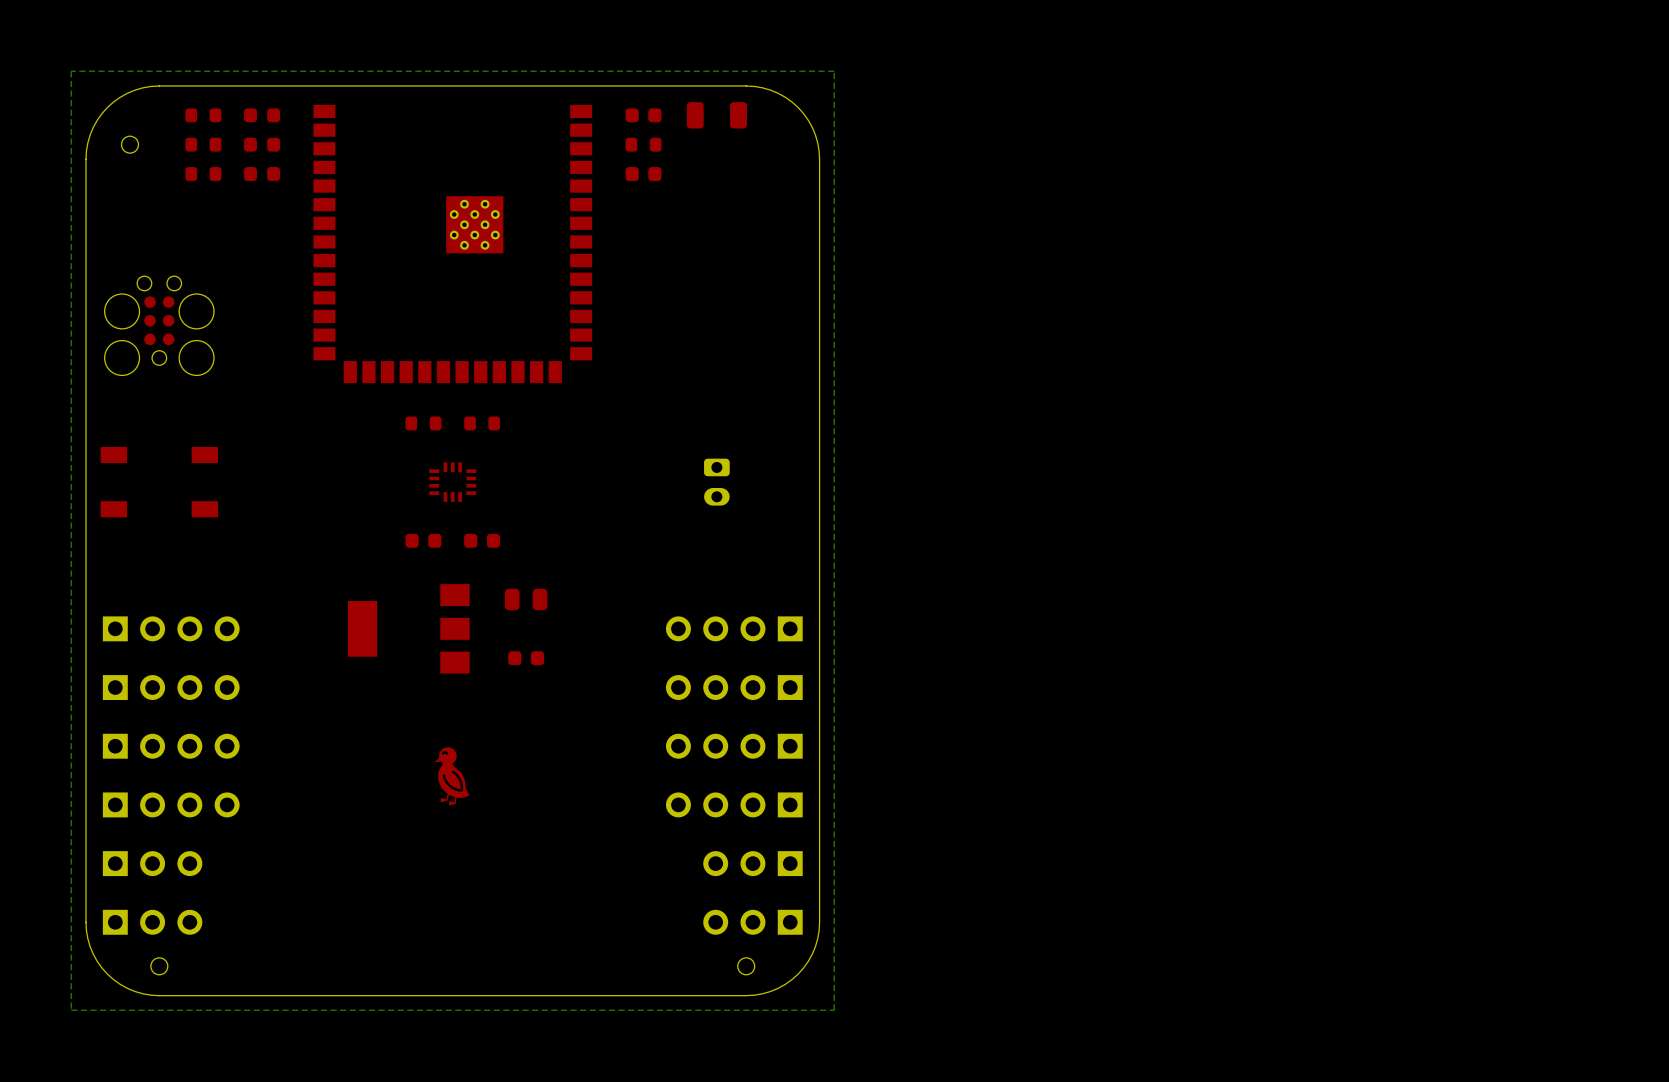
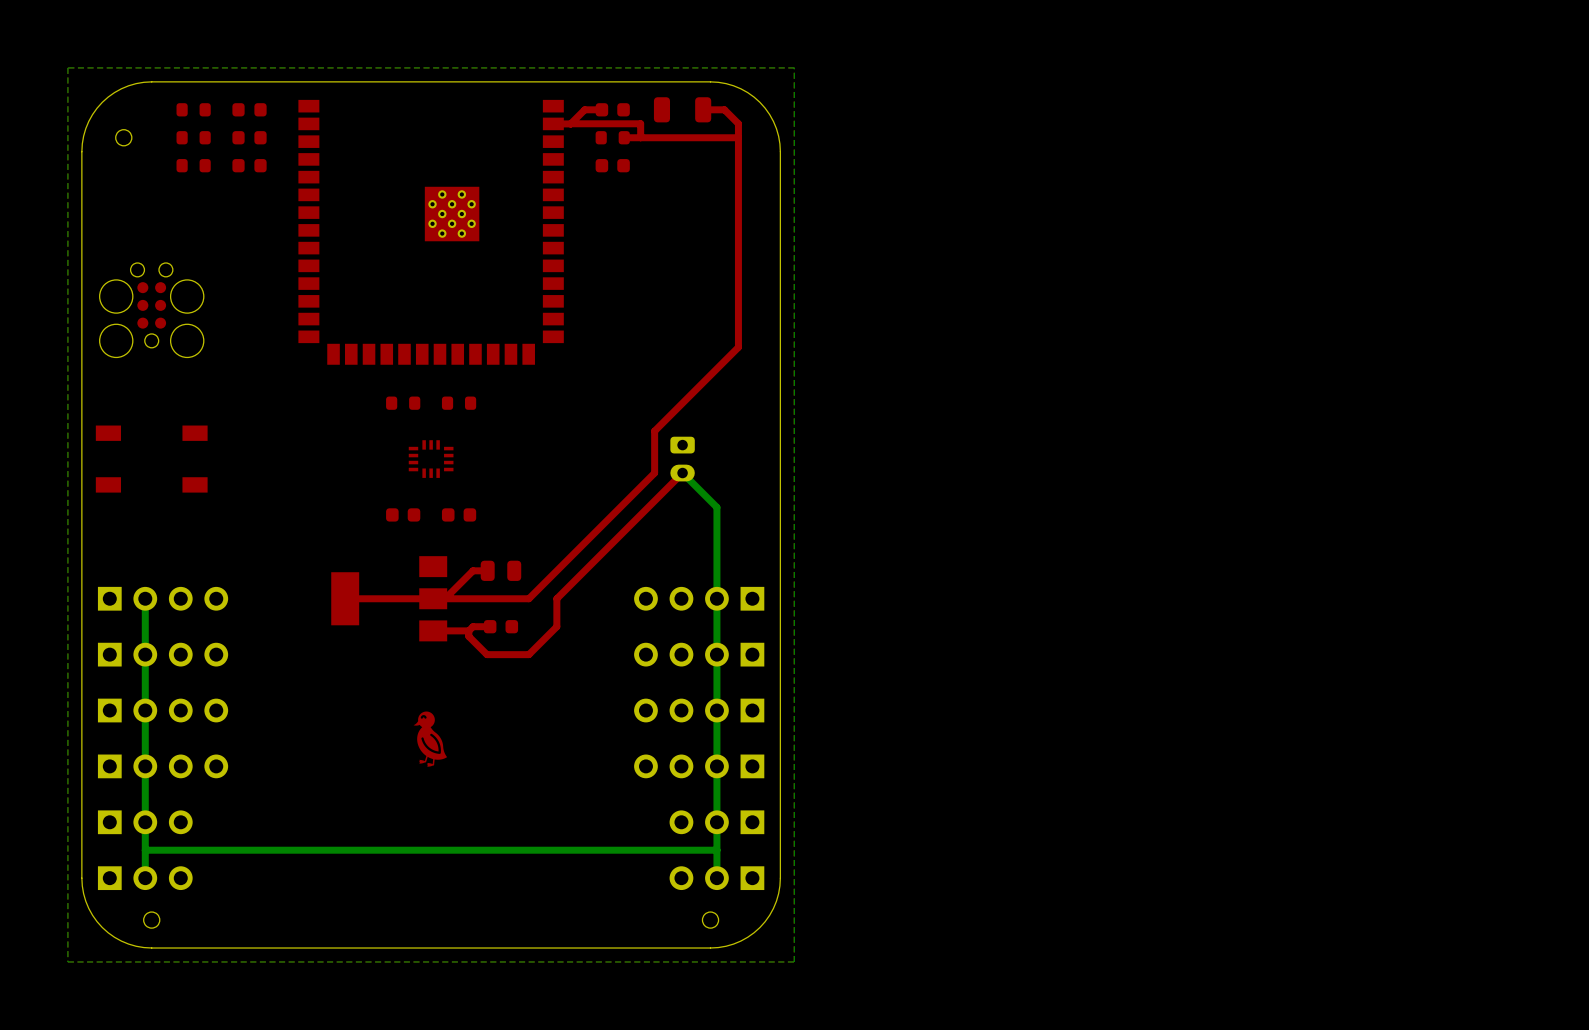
top track: none -> (601, 109) (584, 109) (570, 123) (553, 123)
top track: none -> (703, 109) (724, 109) (738, 123) (738, 347) (654, 431) (654, 473) (528, 598) (345, 598)
top track: none -> (570, 123) (640, 123) (640, 137)
top track: none -> (738, 137) (624, 137)
top track: none -> (682, 473) (556, 598) (556, 626) (528, 654) (487, 654) (468, 636) (468, 630)
bottom track: none -> (682, 473) (716, 507) (716, 878)
top track: none -> (487, 570) (473, 570) (445, 598)
bottom track: none -> (145, 598) (145, 878)
top track: none -> (490, 626) (473, 626) (468, 630)
top track: none -> (468, 630) (433, 630)
bottom track: none -> (716, 850) (145, 850)

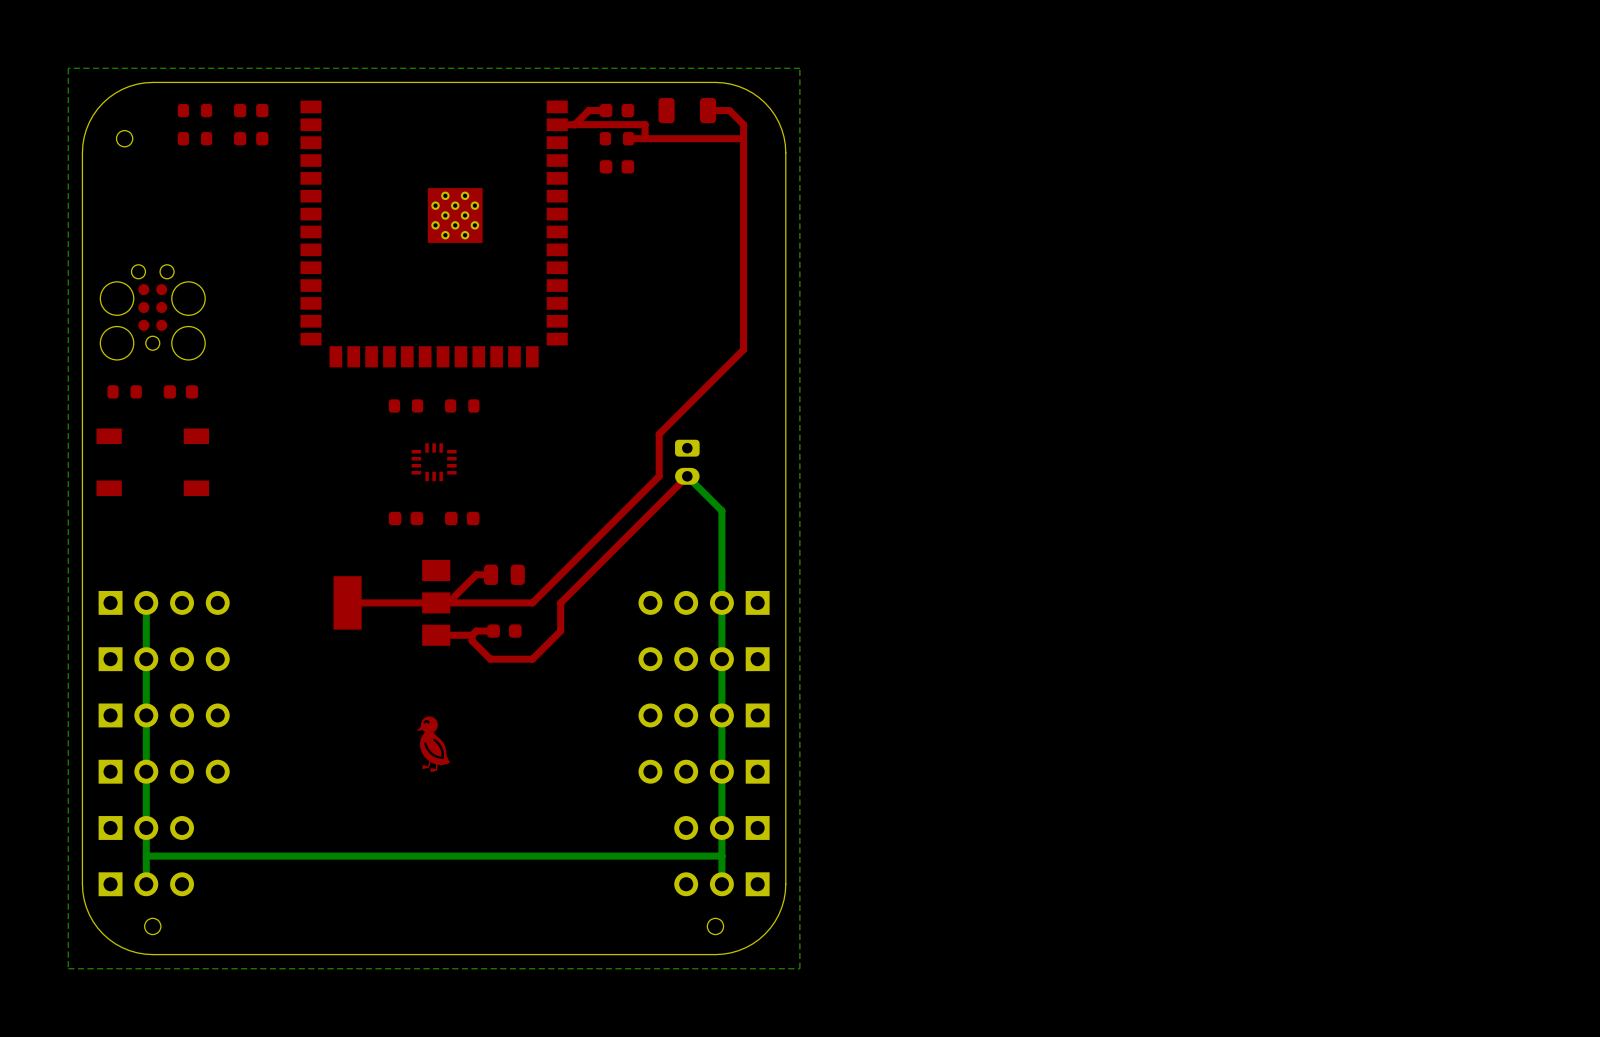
part position: (193, 165) -> (124, 391)
part position: (249, 165) -> (180, 391)

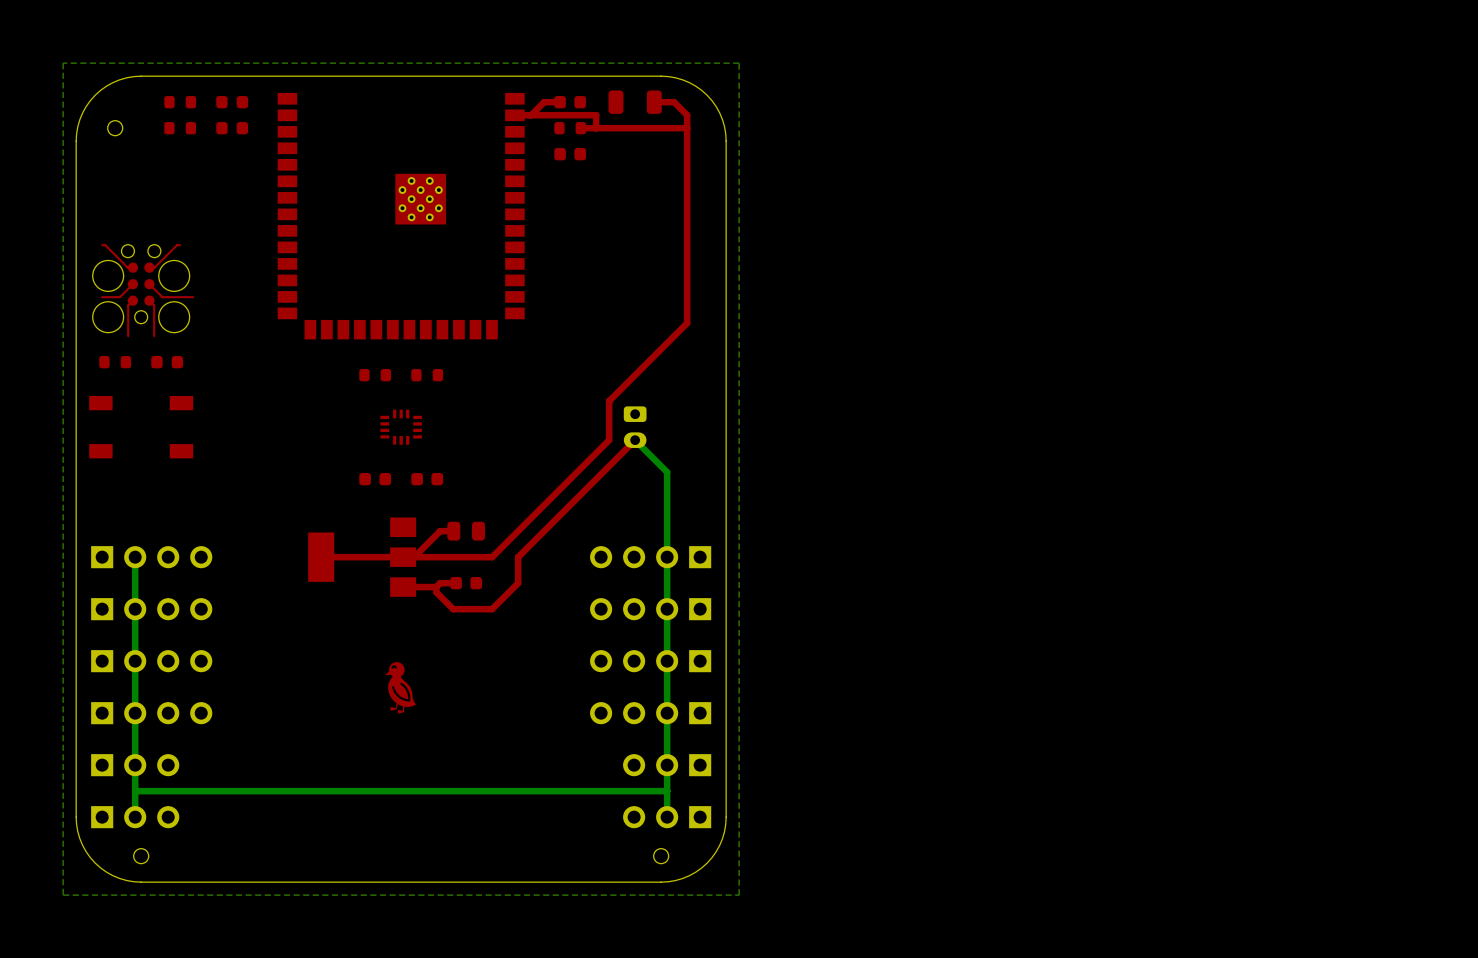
top track: none -> (102, 245) (105, 245) (127, 267) (132, 267)
top track: none -> (180, 245) (177, 245) (154, 267) (149, 267)
top track: none -> (132, 284) (119, 297) (102, 297)
top track: none -> (149, 284) (162, 297) (193, 297)
top track: none -> (132, 300) (128, 305) (128, 336)
top track: none -> (149, 300) (154, 305) (154, 336)

